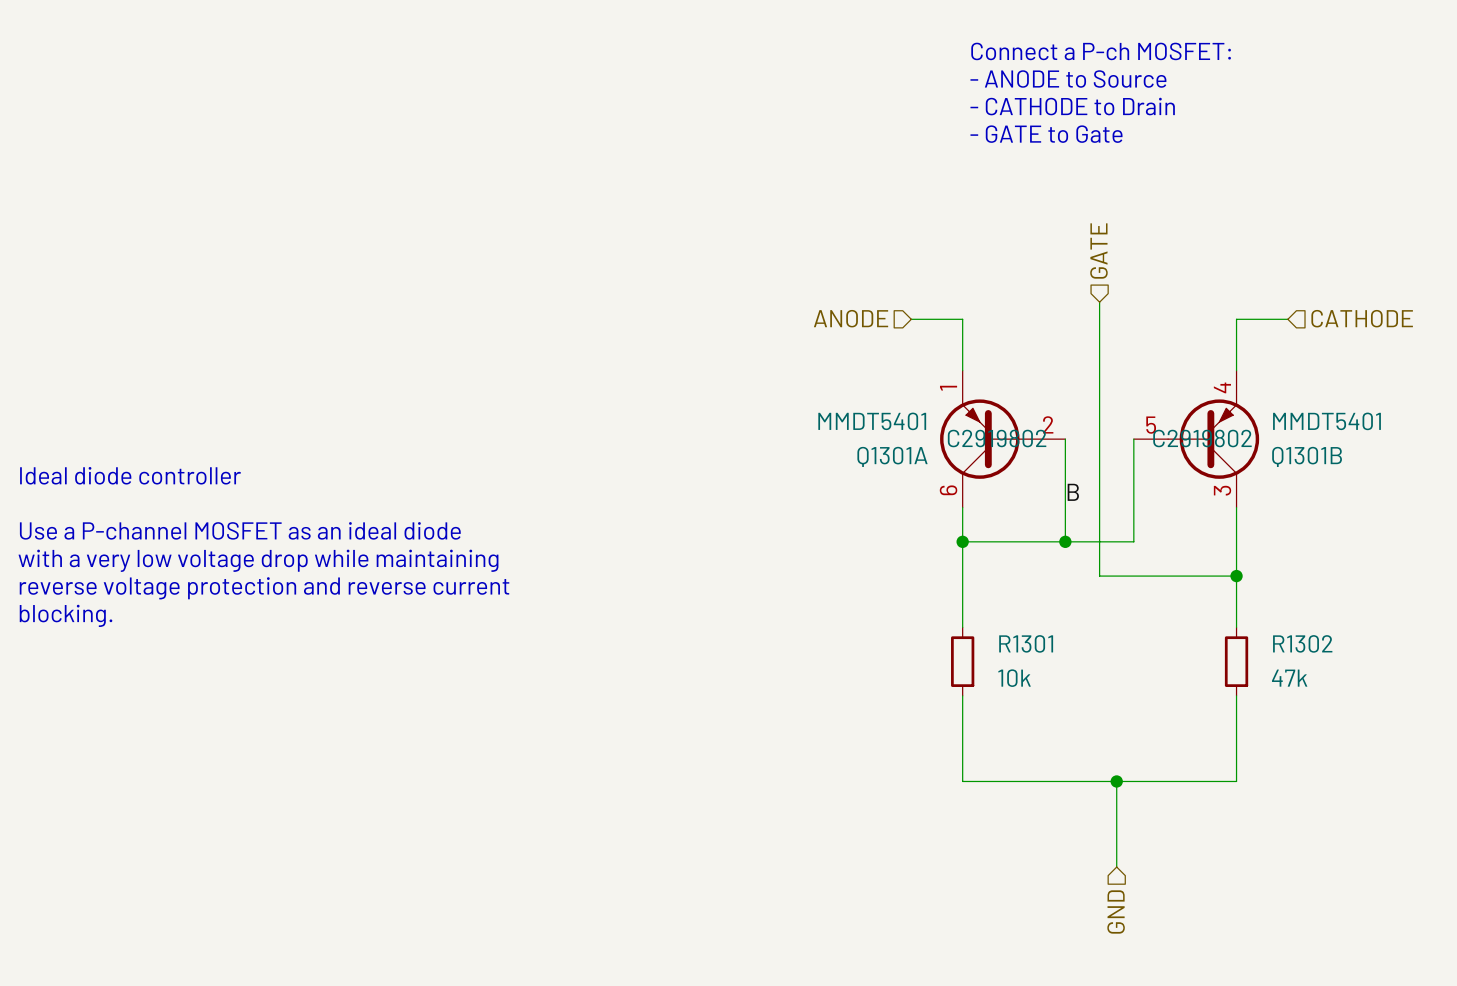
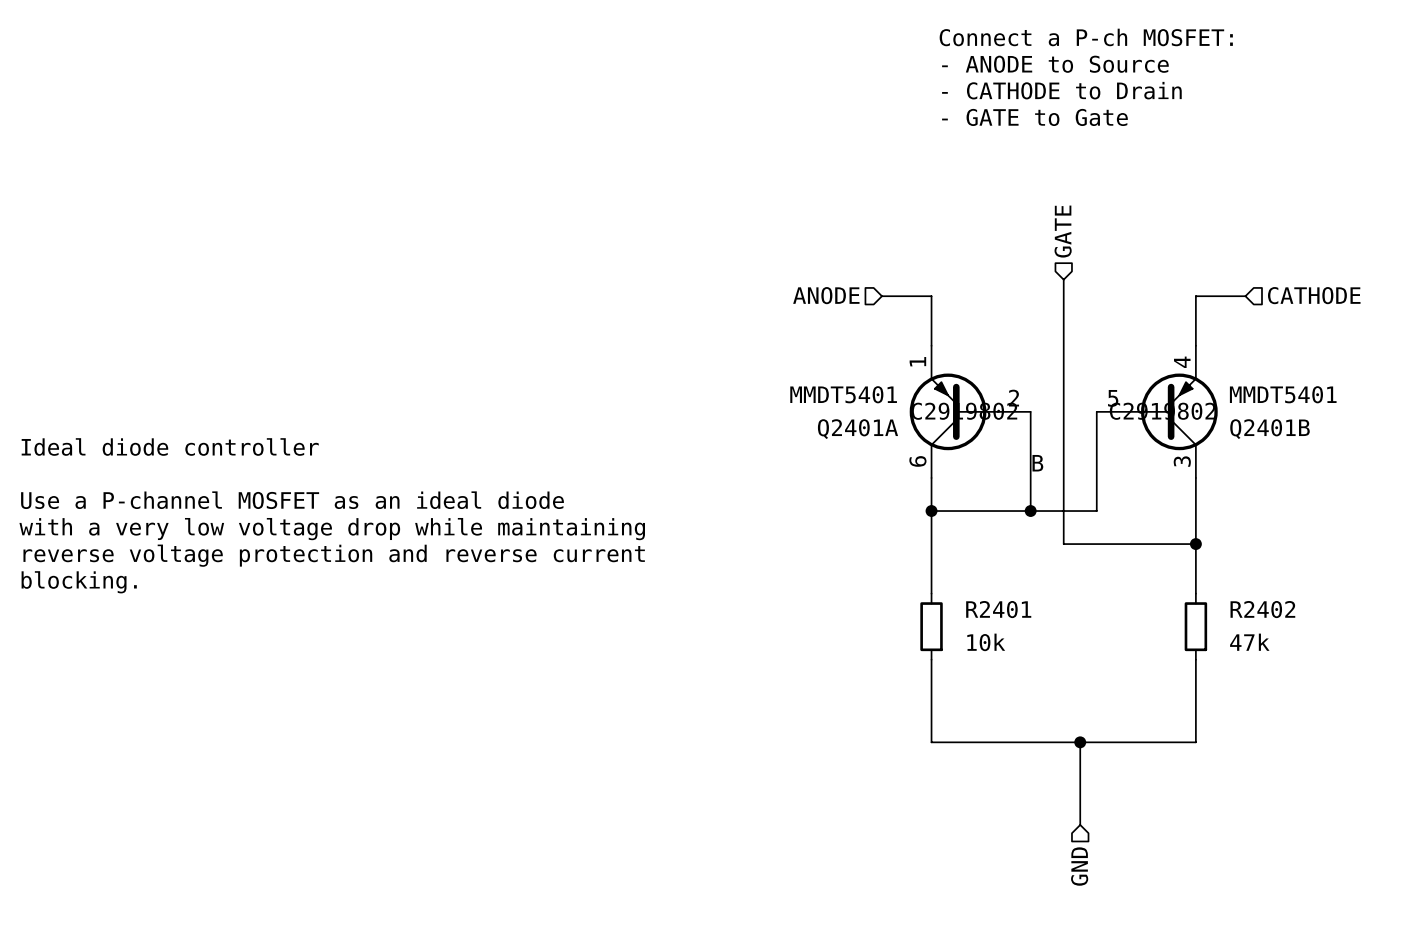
Q1301A name: Q1301A (892, 456) -> Q2401A (857, 429)
Q1301B name: Q1301B (1307, 456) -> Q2401B (1270, 429)
R1301 name: R1301 (1026, 643) -> R2401 (998, 609)
R1302 name: R1302 (1302, 643) -> R2402 (1262, 609)

